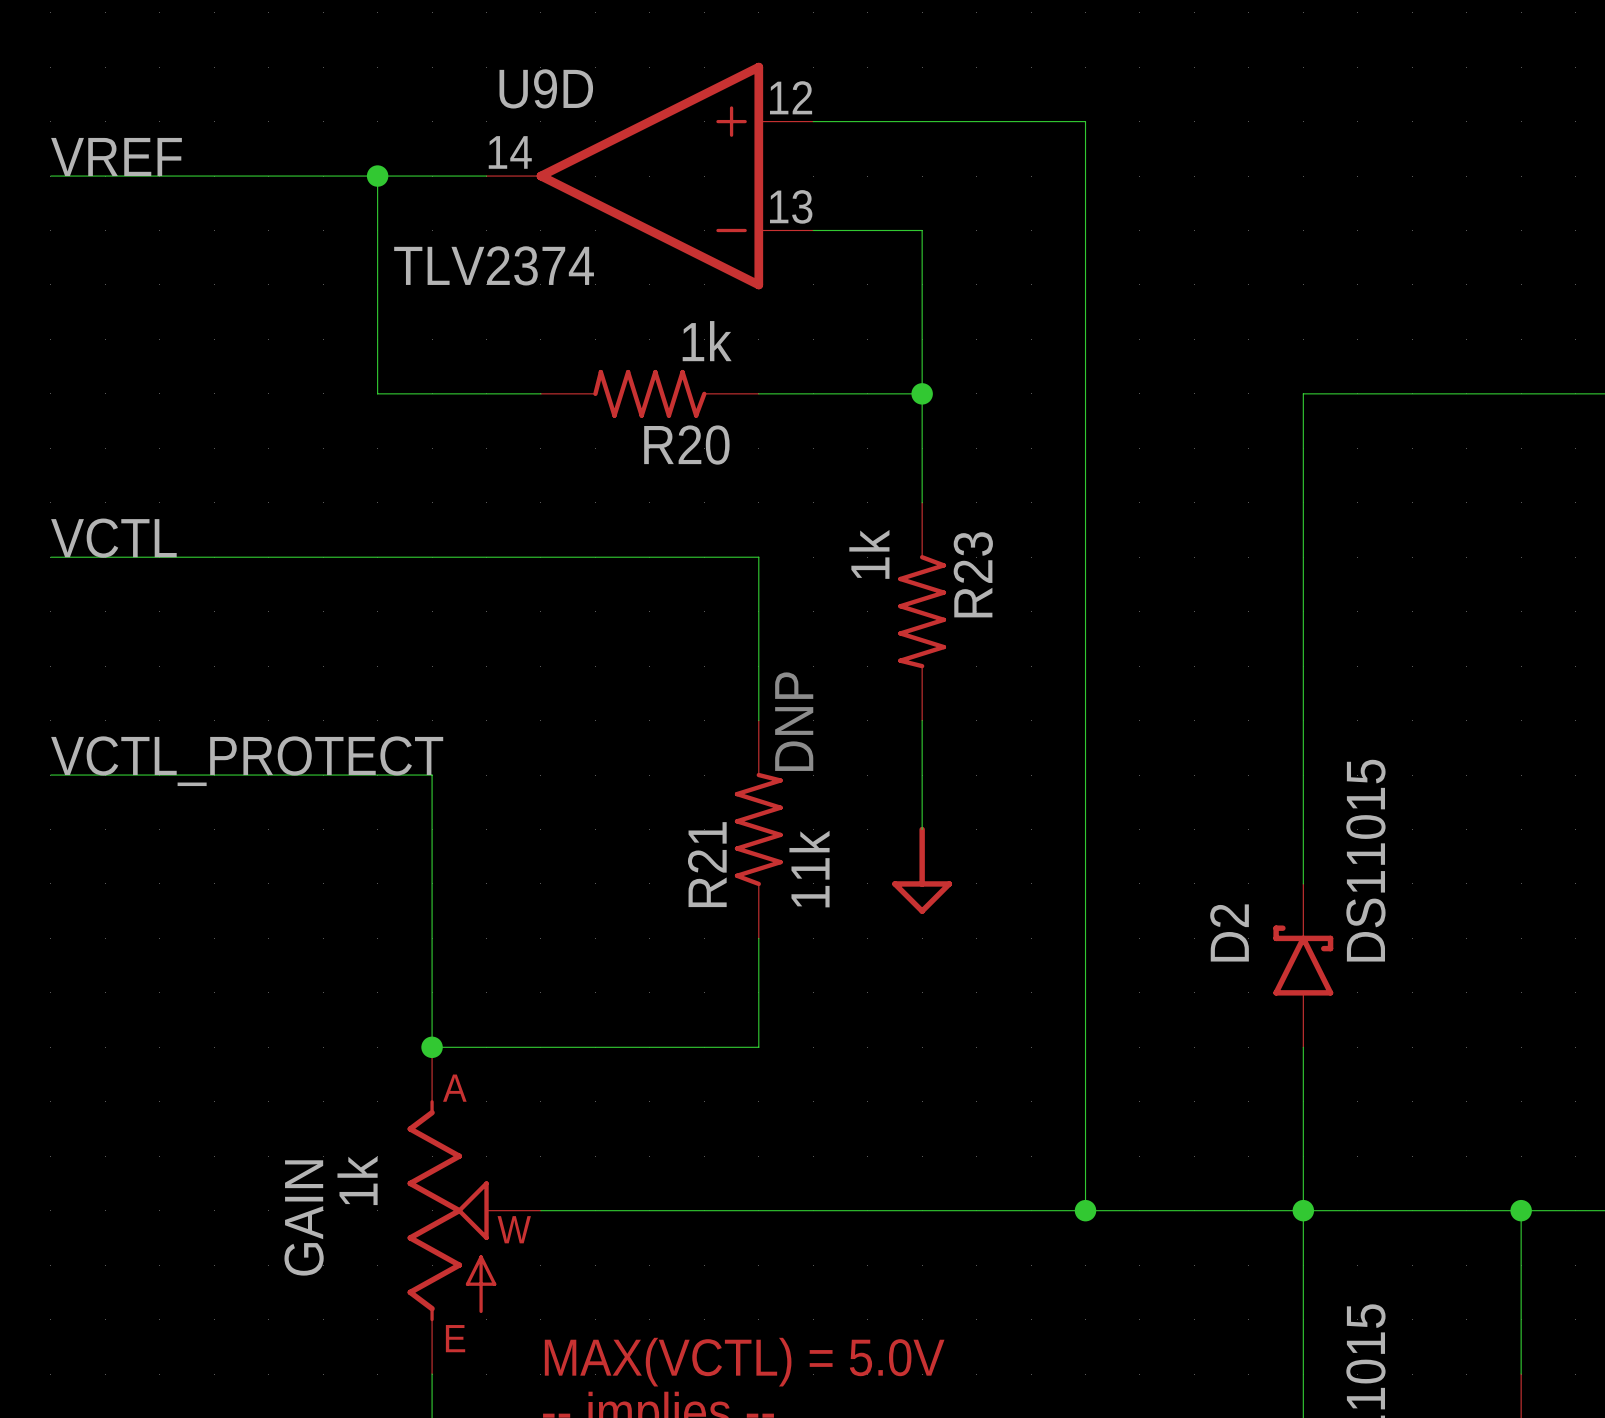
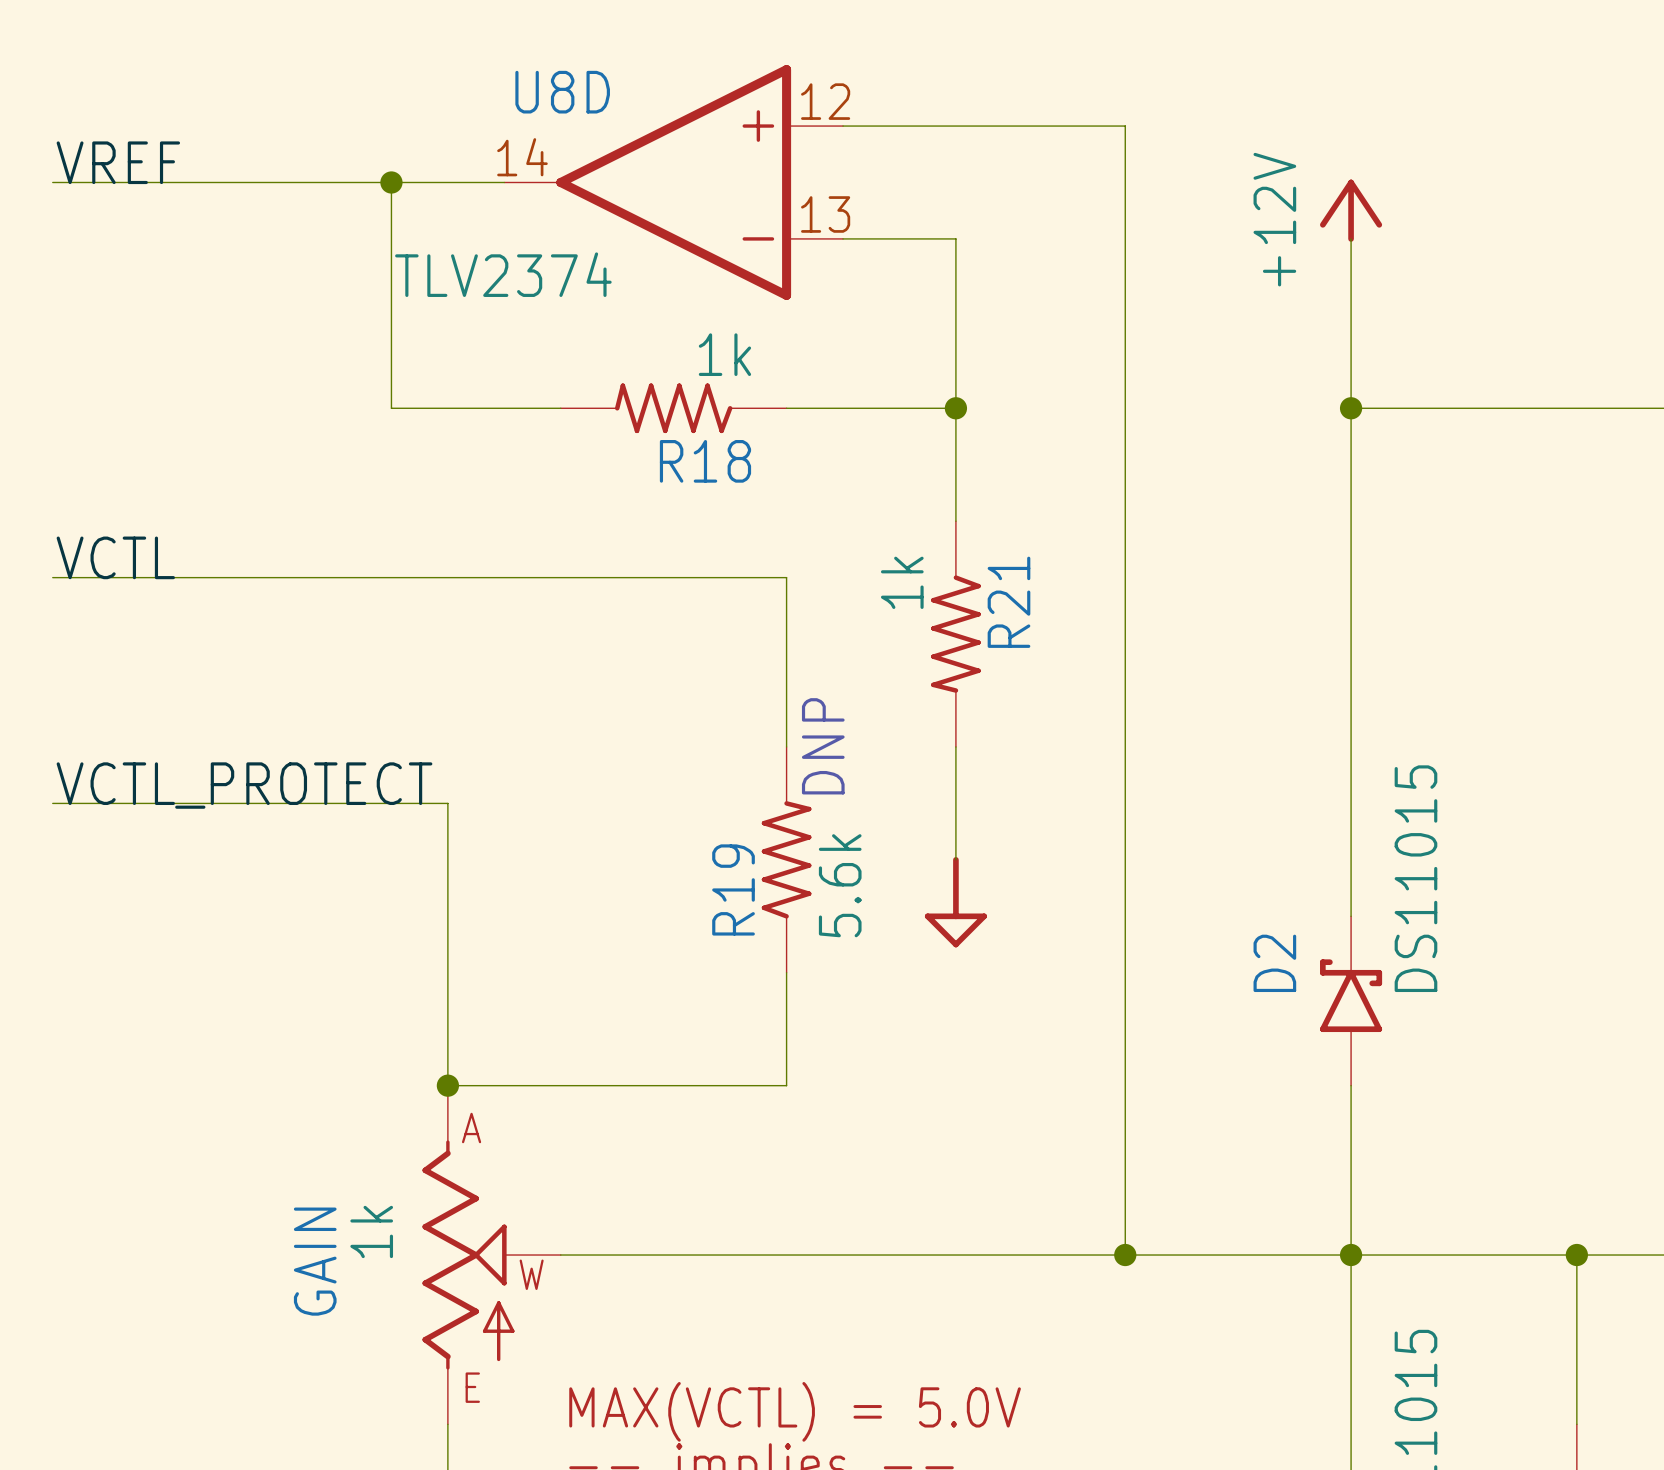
U9D name: U9D (546, 88) -> U8D (562, 92)
part: none -> +12V (1351, 210)
wire: none -> (1351, 238) (1351, 408)
junction: none -> (1351, 408)
R20 name: R20 (686, 445) -> R18 (705, 461)
R23 name: R23 (973, 574) -> R21 (1008, 602)
R21 name: R21 (707, 864) -> R19 (733, 889)
R21 value: 11k (809, 869) -> 5.6k (840, 885)

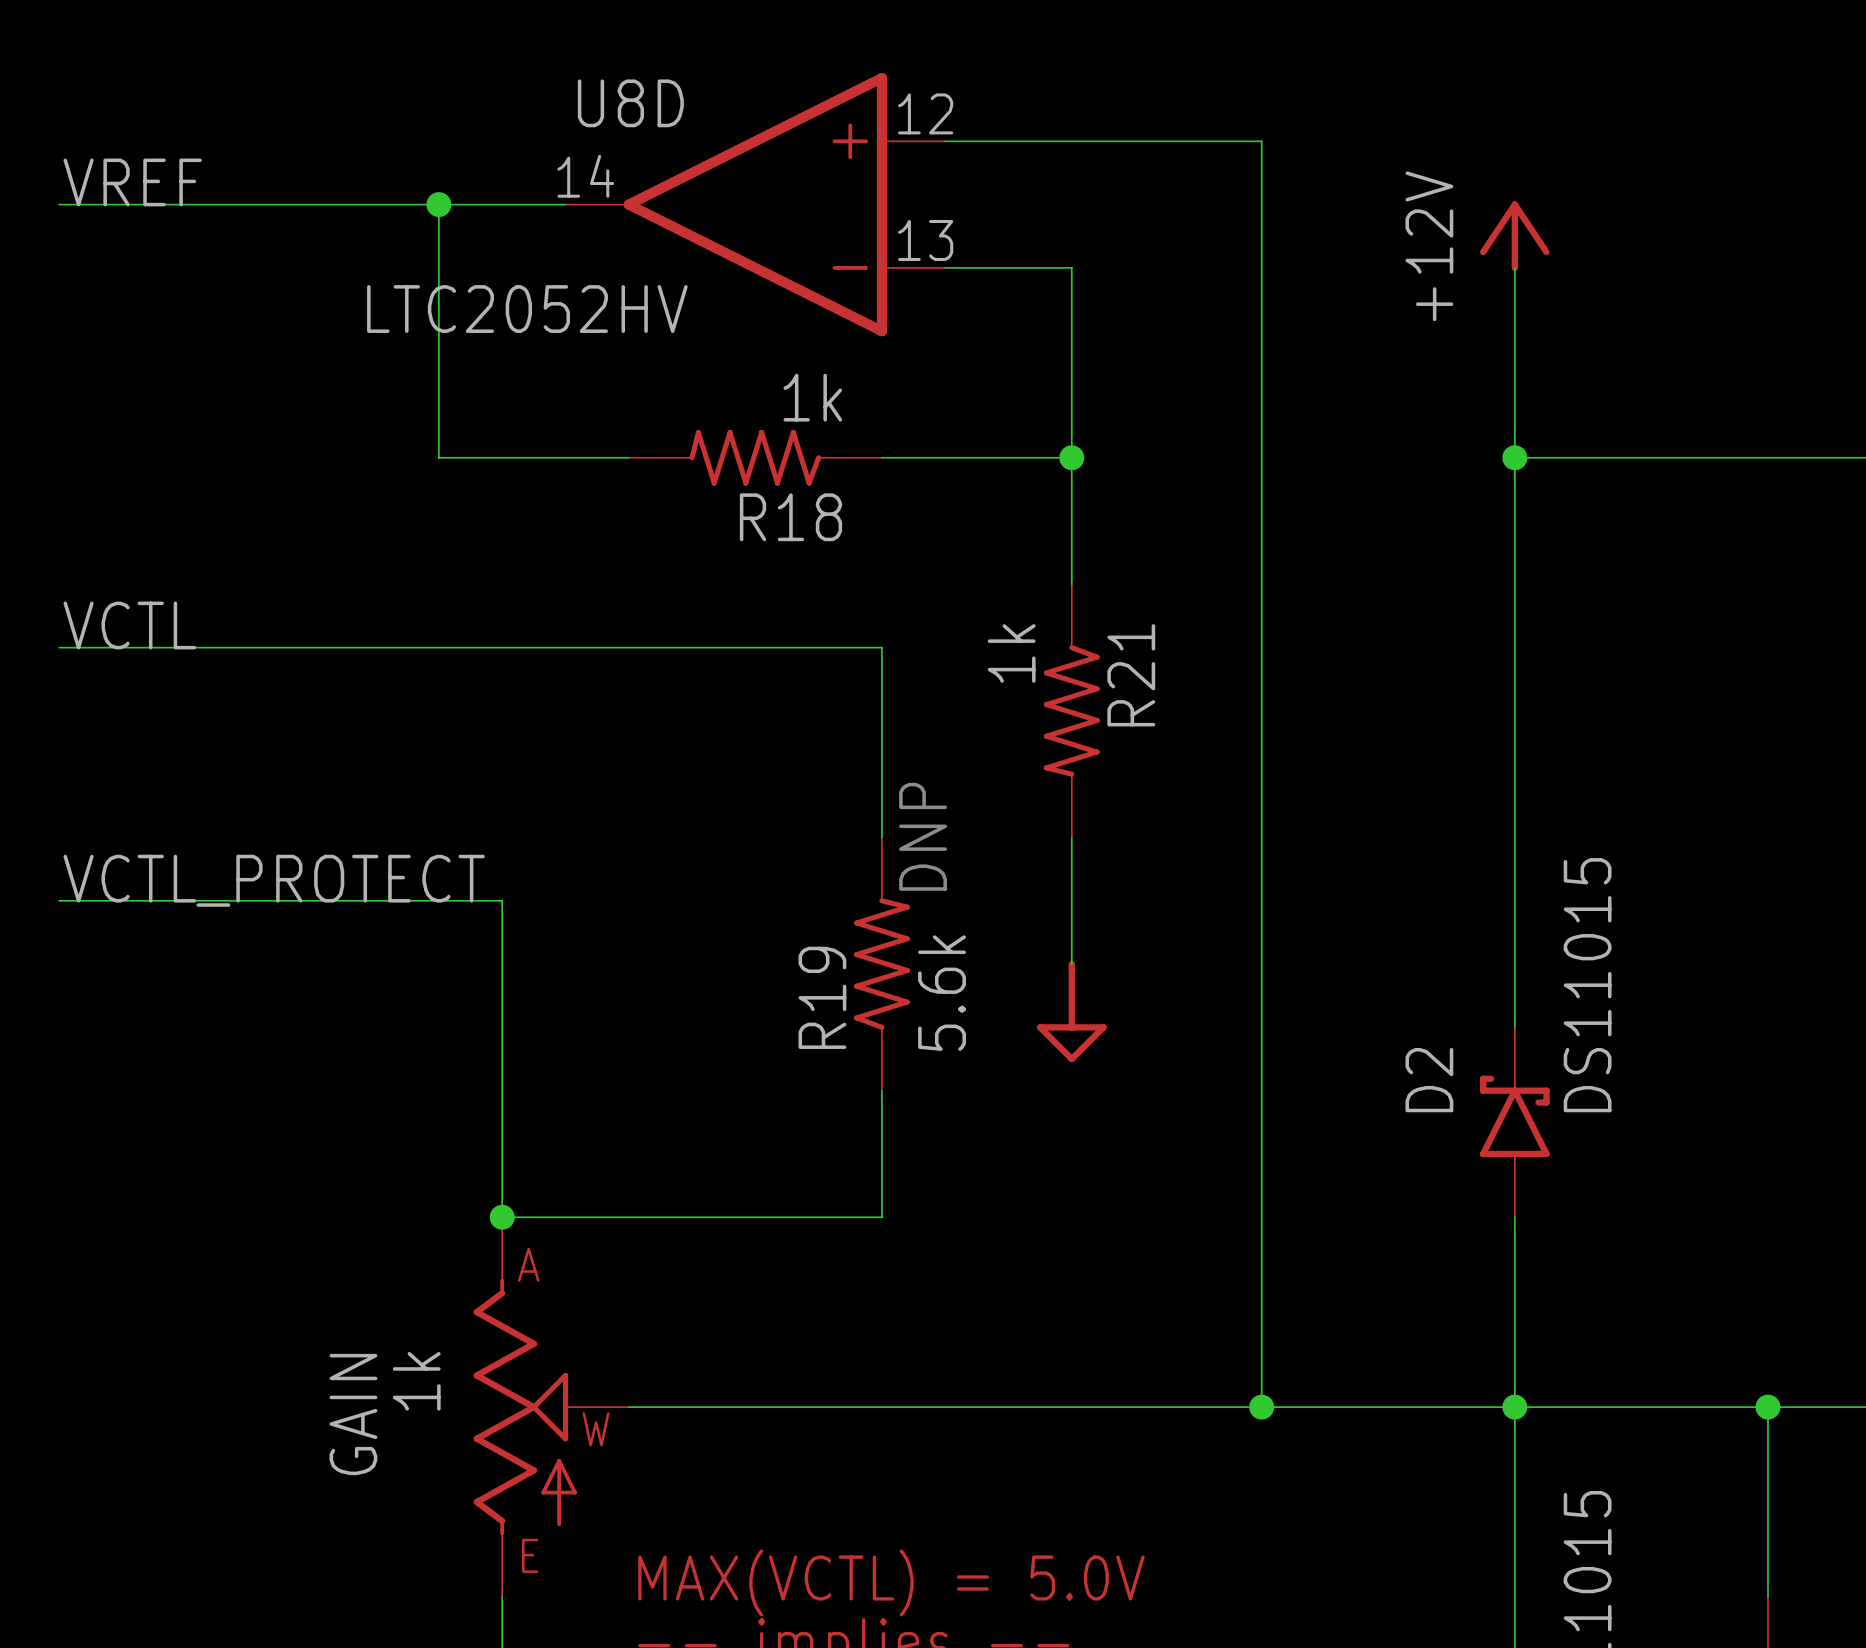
U8D value: TLV2374 (503, 274) -> LTC2052HV (527, 309)

